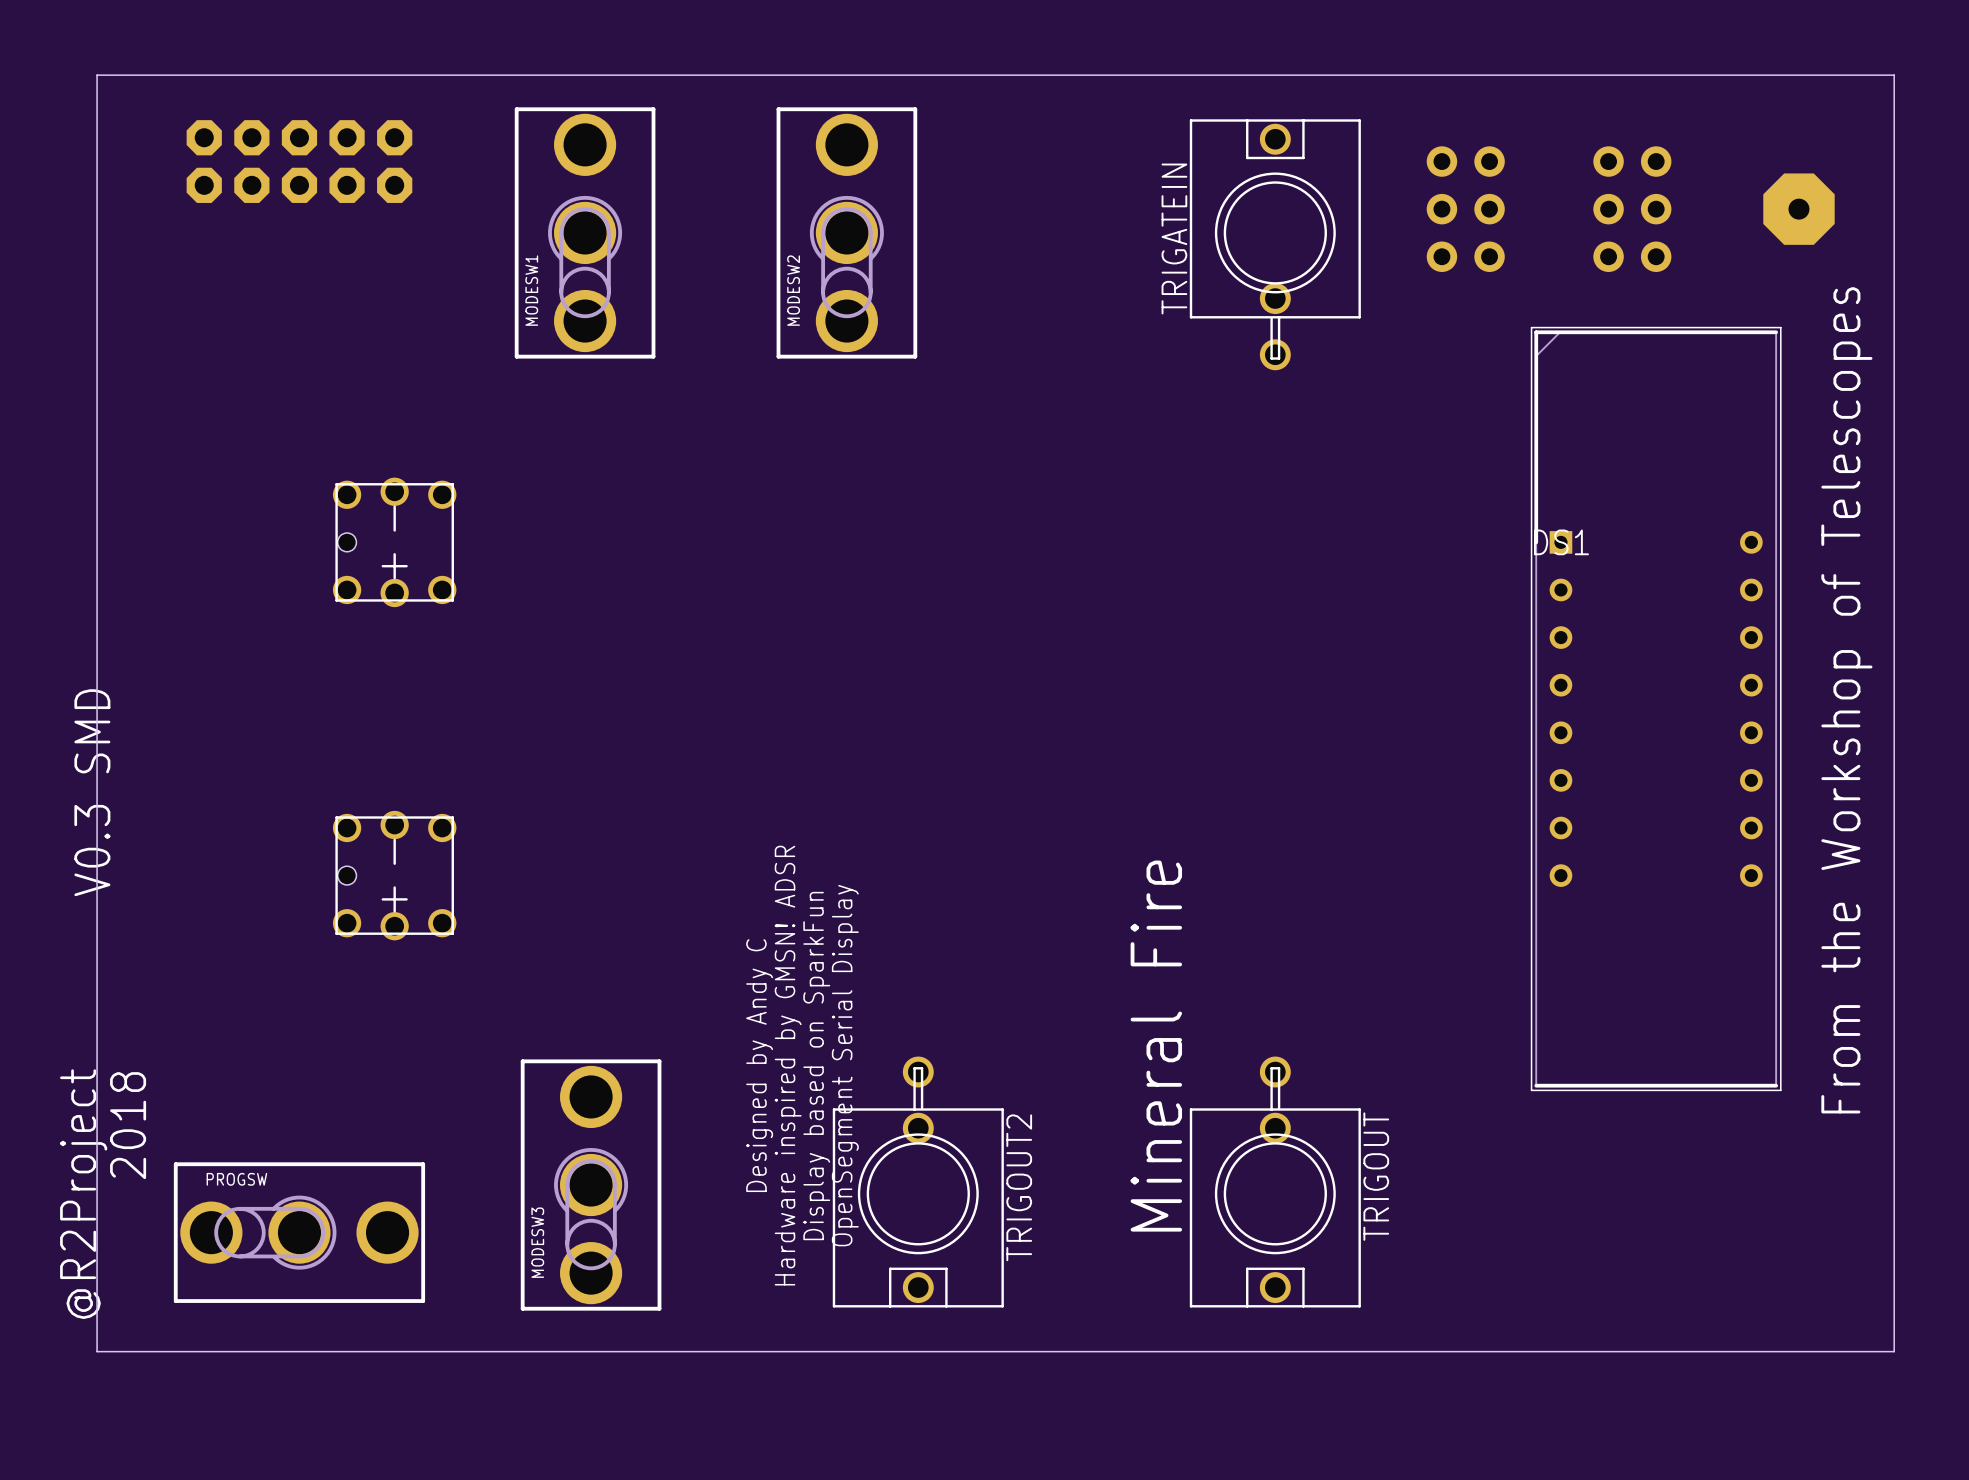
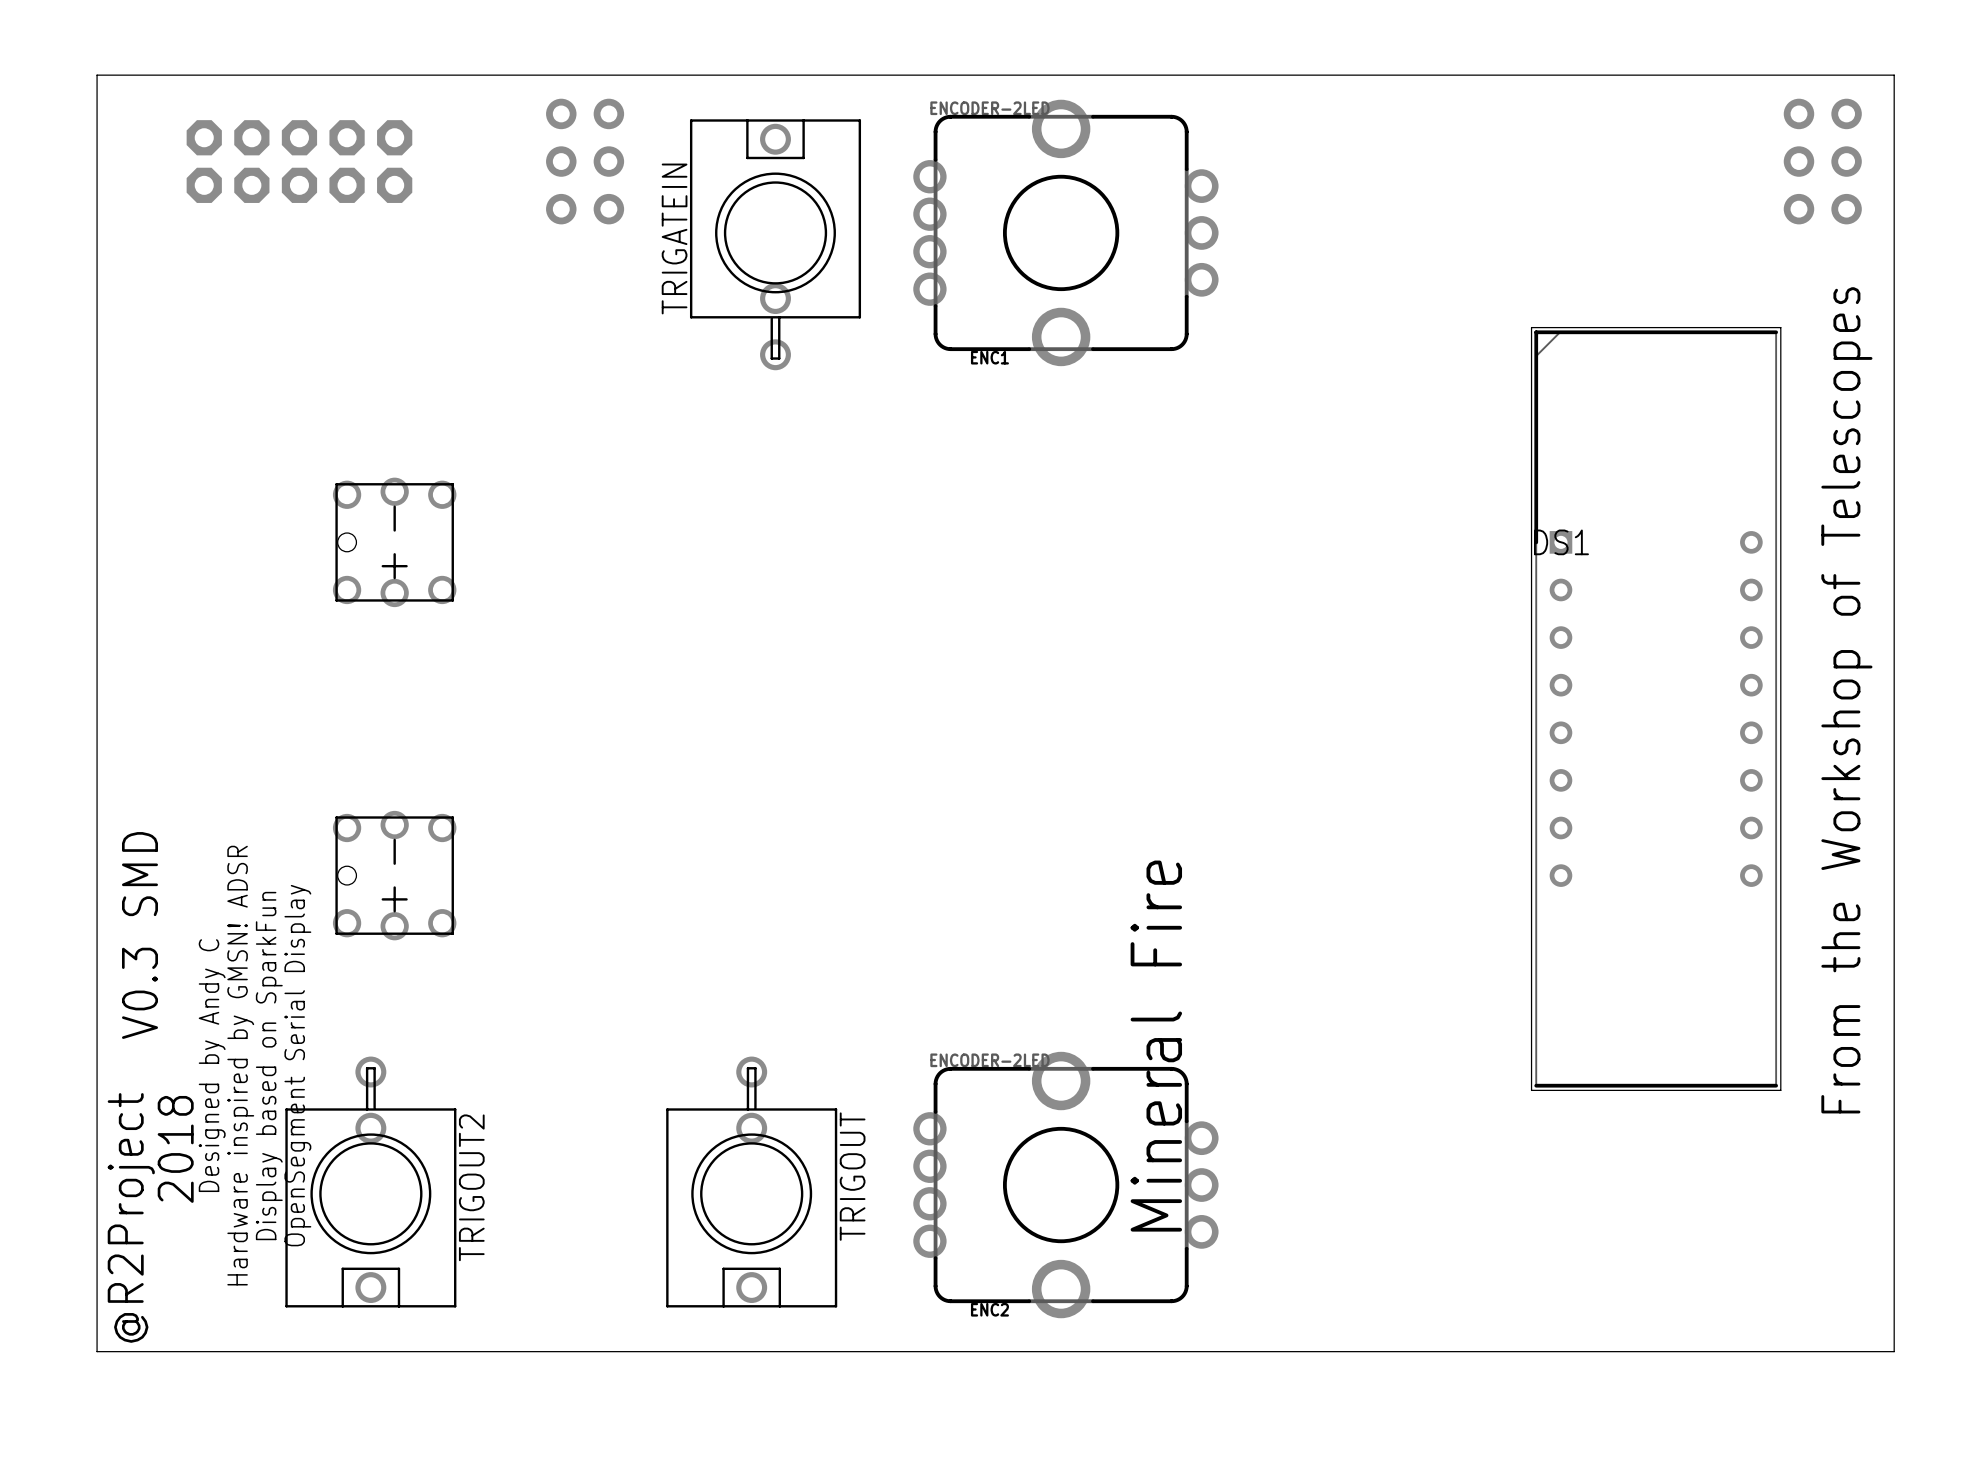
part: none -> (585, 161)
part: none -> (1822, 161)
part: (1465, 209) -> none
part: (1632, 209) -> none
part: (1798, 209) -> none
MODESW1: (585, 232) -> none
MODESW2: (846, 232) -> none
ENC1: none -> ENCODER-2LED (1065, 232)
TRIGATEIN: none -> (775, 244)
TRIGATEIN: (1275, 244) -> none
text position: V0.3 SMD (92, 792) -> V0.3 SMD (139, 935)
text: none -> Designed by Andy C (212, 1065)
text: none -> Hardware inspired by GMSN! ADSR (240, 1065)
text: none -> OpenSegment Serial Display (297, 1065)
text: Designed by Andy C (759, 1065) -> none
text: Hardware inspired by GMSN! ADSR (788, 1065) -> none
text: OpenSegment Serial Display (845, 1065) -> none
text: none -> Display based on SparkFun (269, 1066)
text: Display based on SparkFun (816, 1066) -> none
text position: 2018 (128, 1125) -> 2018 (175, 1149)
TRIGOUT: none -> (751, 1182)
TRIGOUT2 position: (918, 1182) -> (370, 1182)
TRIGOUT: (1275, 1182) -> none
MODESW3: (591, 1185) -> none
ENC2: none -> ENCODER-2LED (1065, 1185)
text position: @R2Project (83, 1194) -> @R2Project (131, 1217)
PROGSW: (299, 1232) -> none

